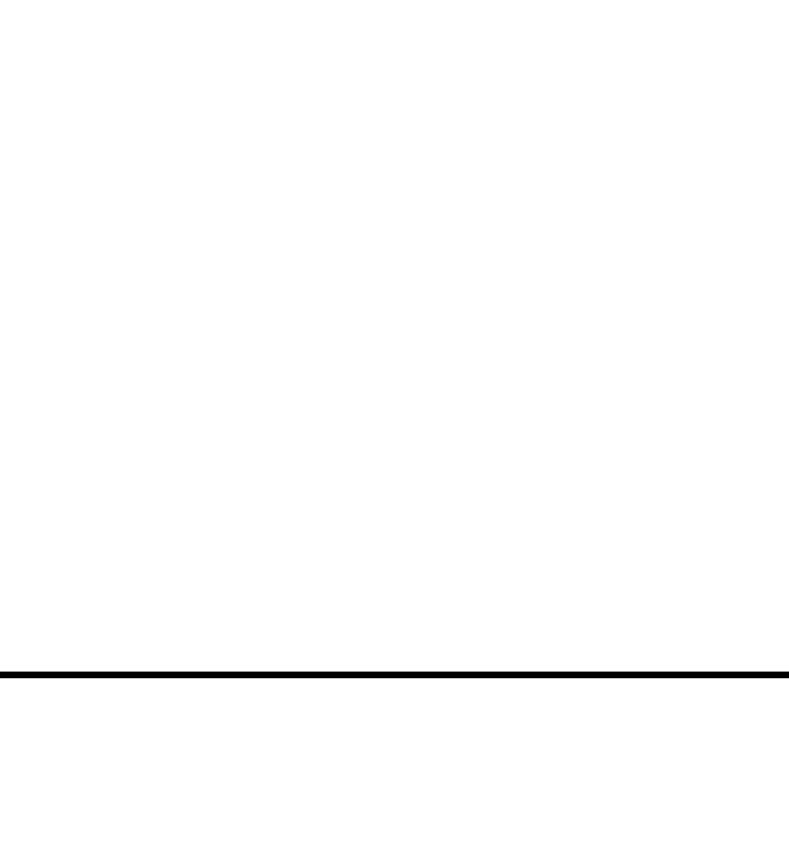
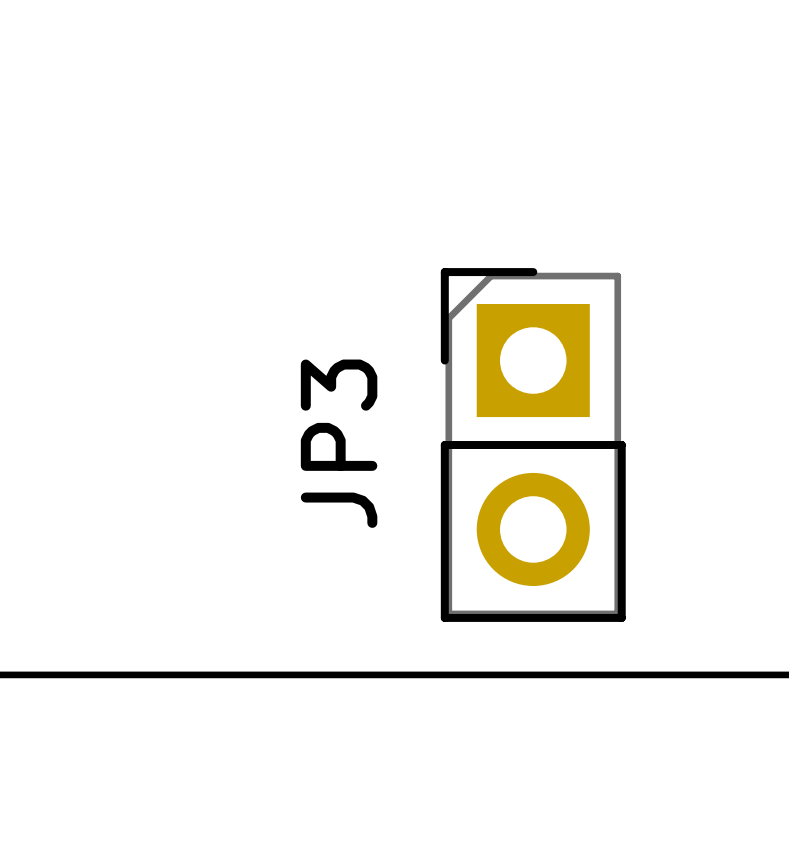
JP3: none -> (533, 445)

